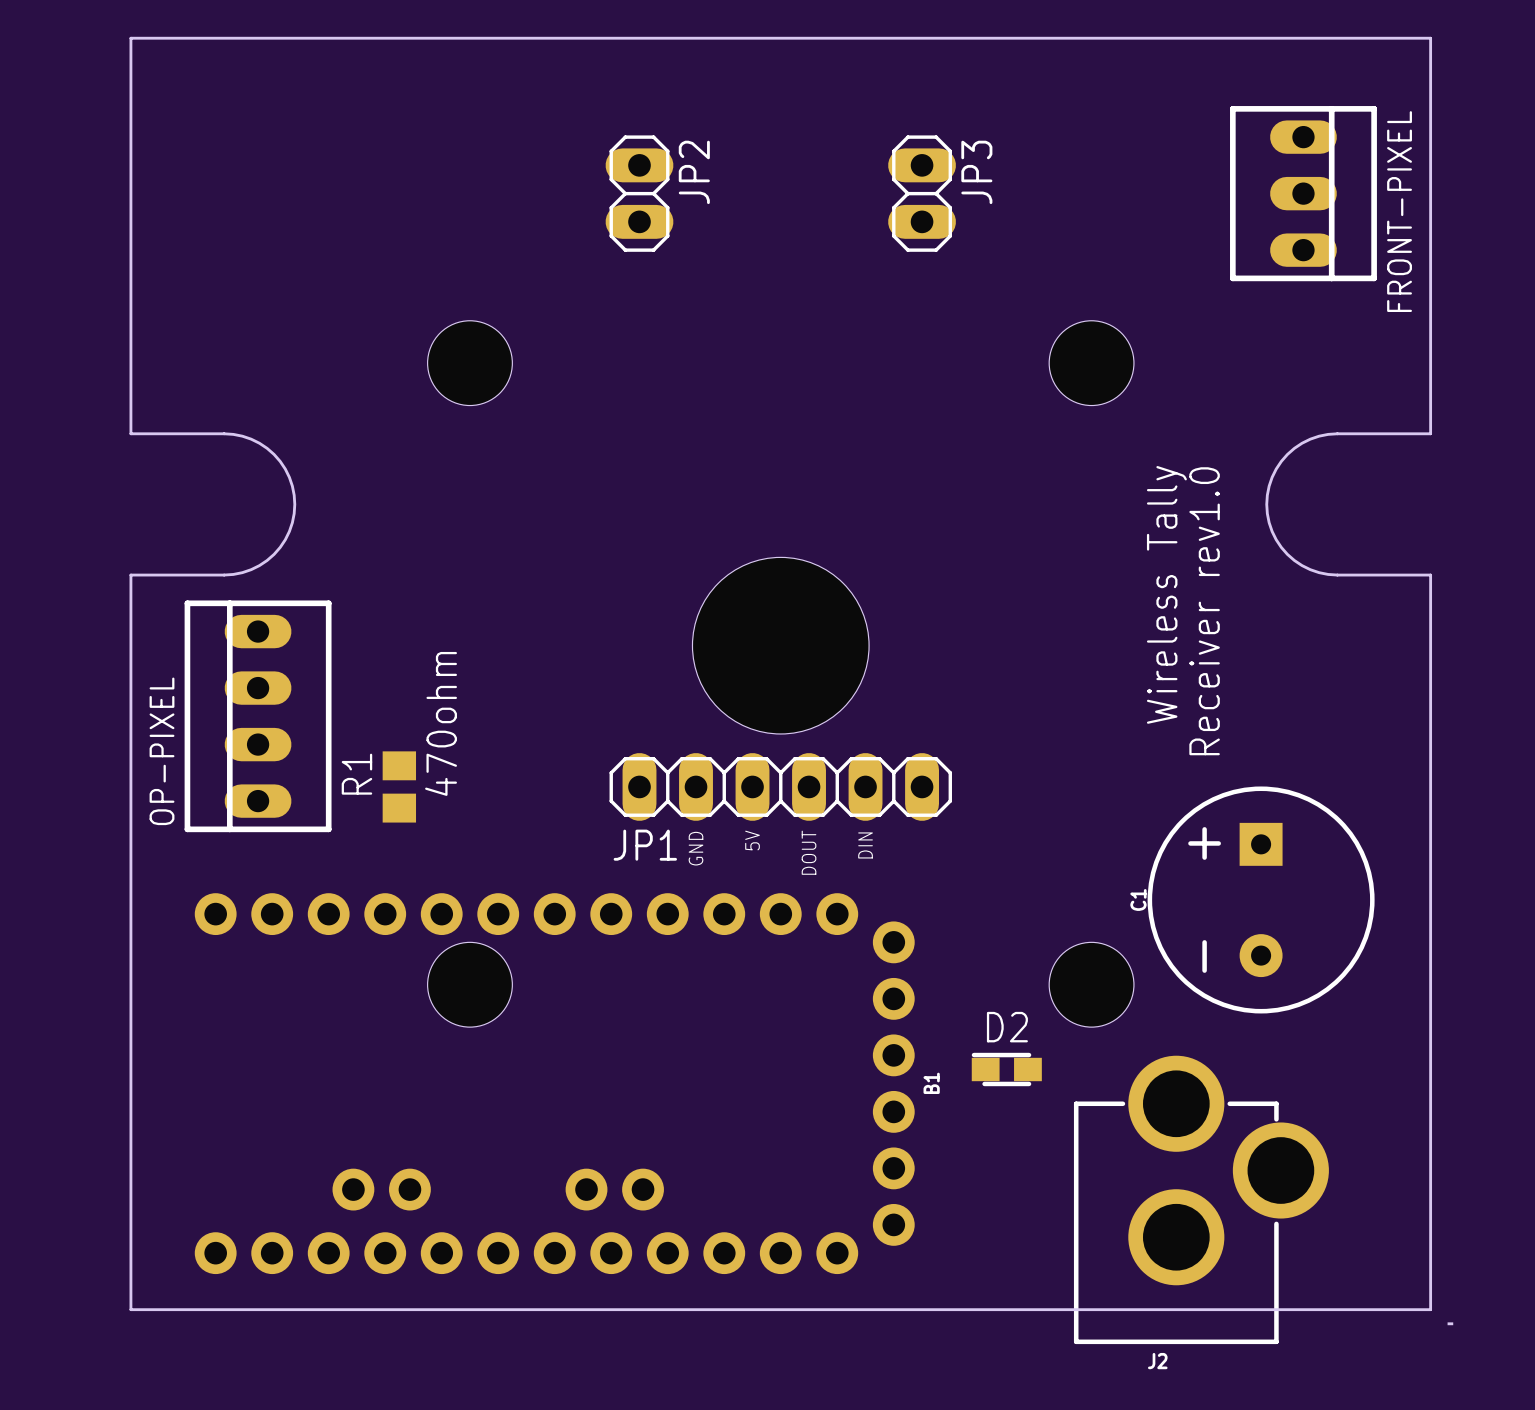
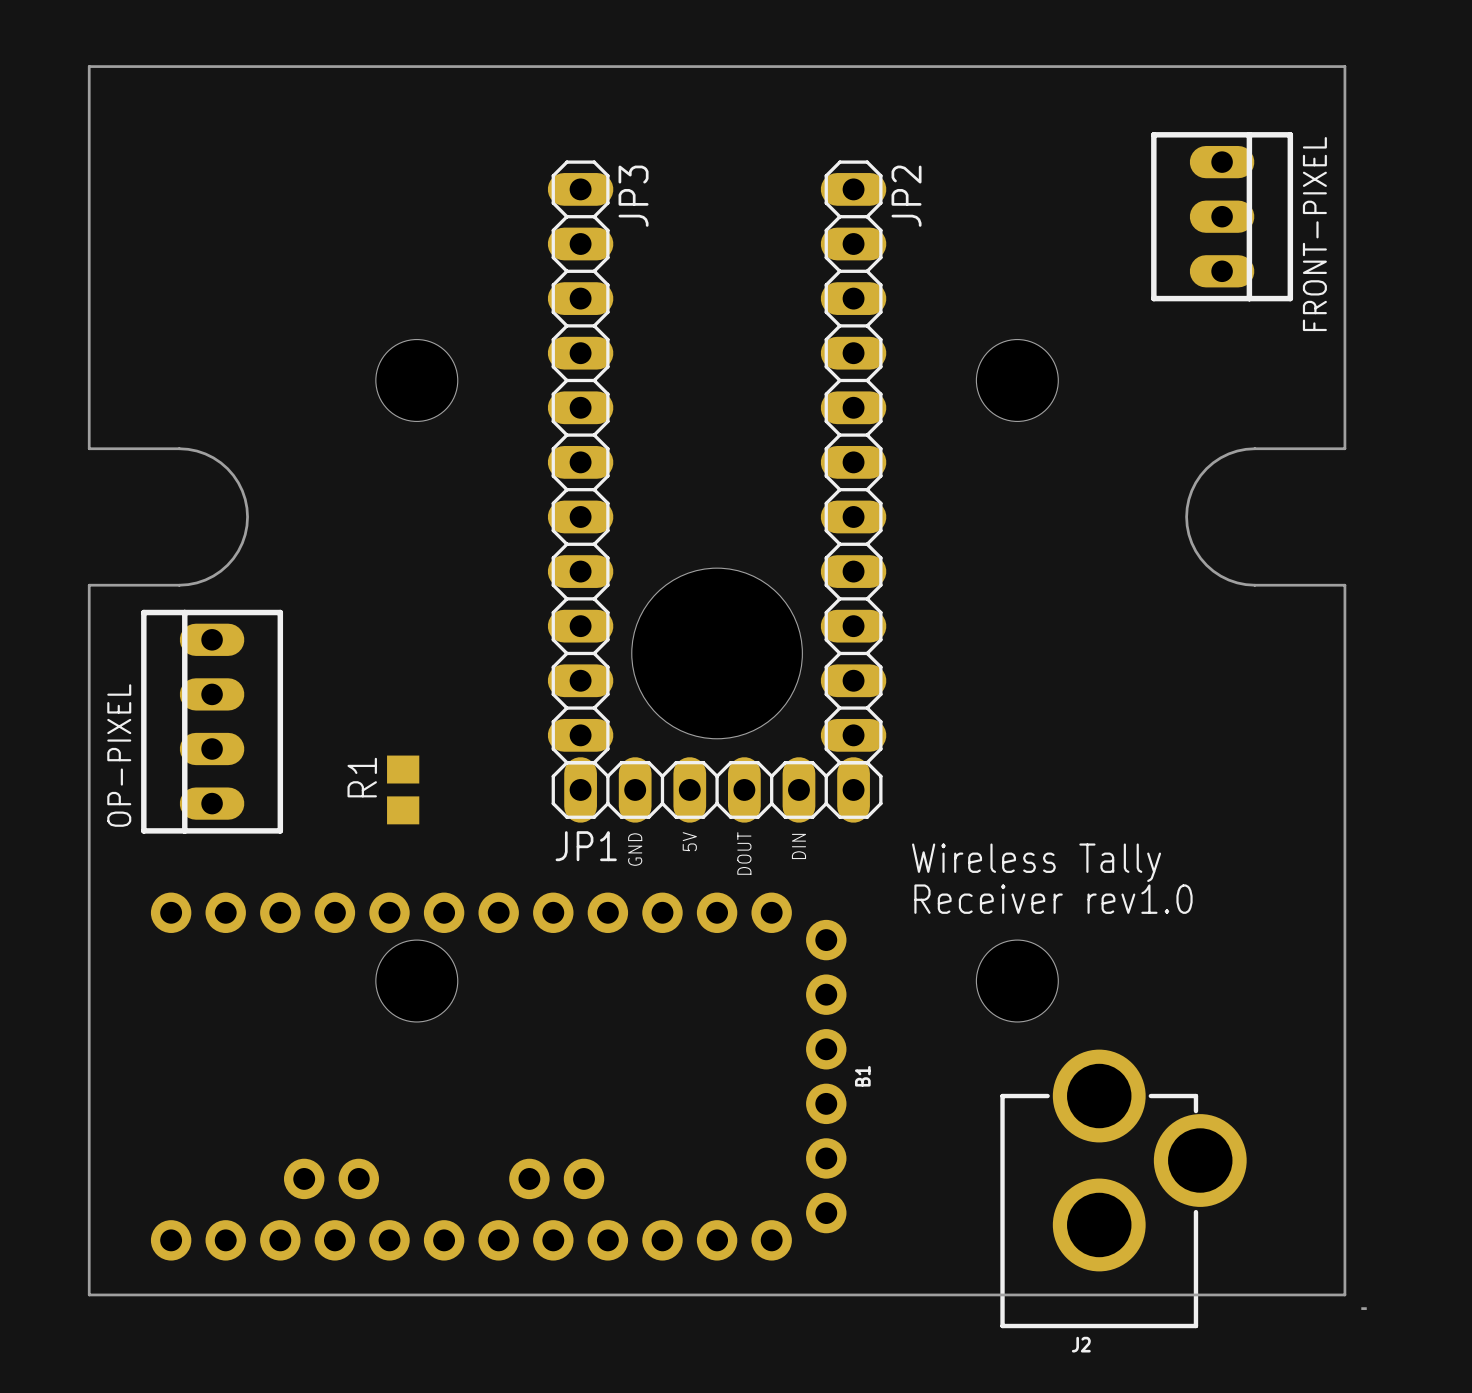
JP2 footprint: [605, 135, 674, 252] -> [820, 160, 887, 765]
JP3 footprint: [888, 135, 956, 252] -> [547, 160, 614, 765]
JP2 name position: JP2 (694, 172) -> JP2 (906, 196)
JP3 name position: JP3 (976, 172) -> JP3 (633, 196)
text rotation: 0° (1166, 594) -> 90° clockwise (1036, 862)
text rotation: 0° (1204, 611) -> 90° clockwise (1053, 899)
R1 value: 470ohm (441, 723) -> none
R1 position: (399, 786) -> (403, 789)
C1: (1261, 899) -> none
D2: (1006, 1069) -> none

